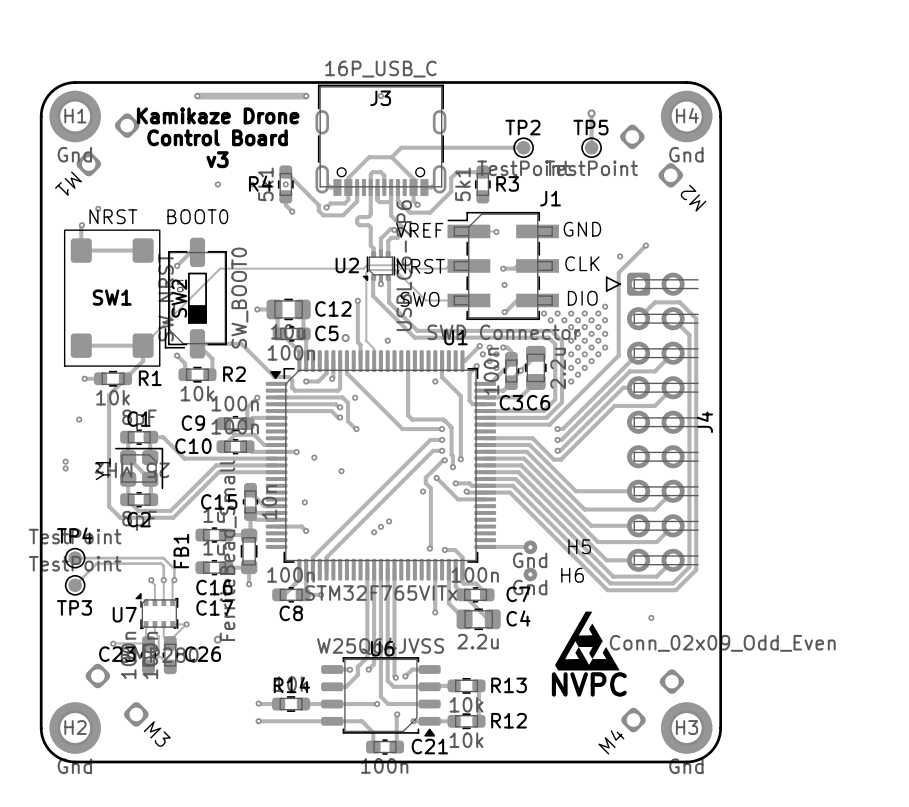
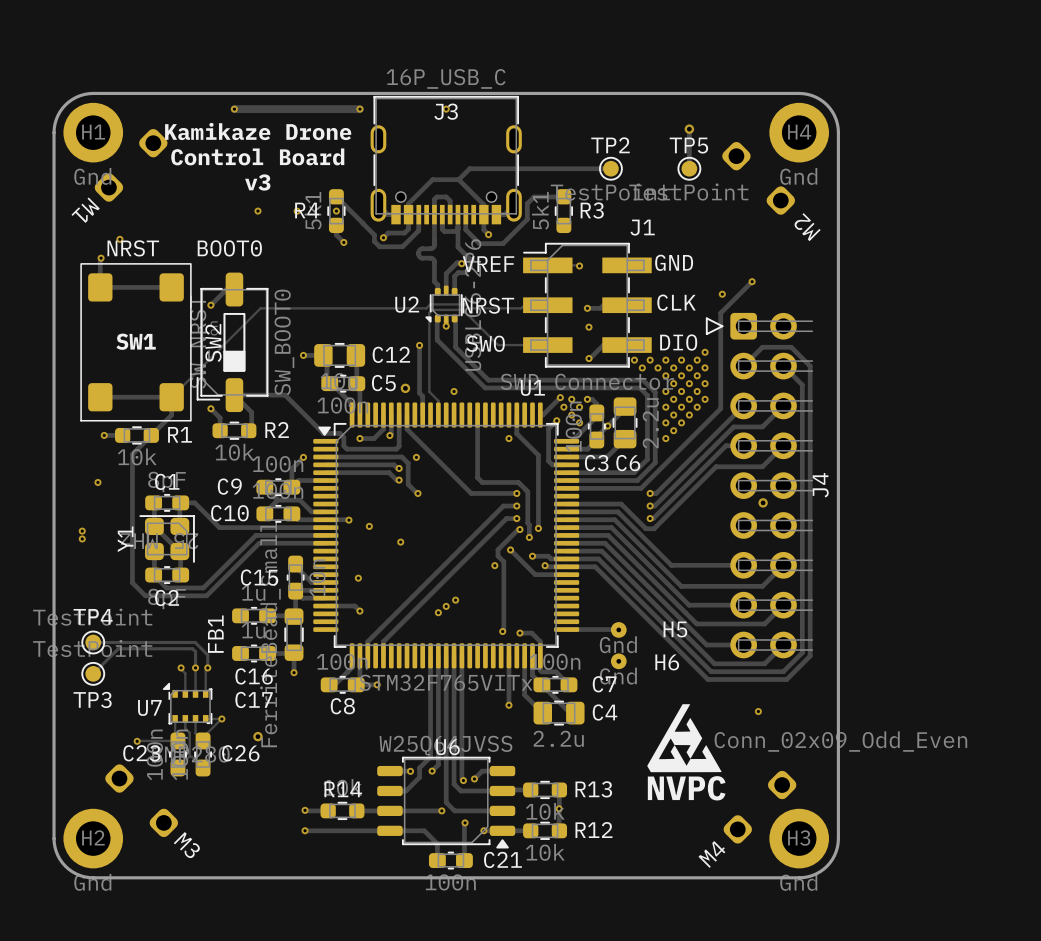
via: none -> (763, 502)

